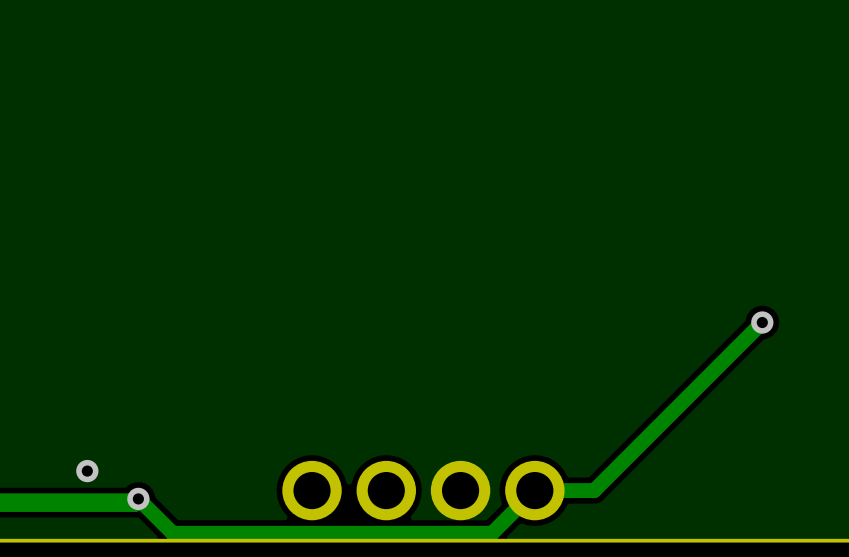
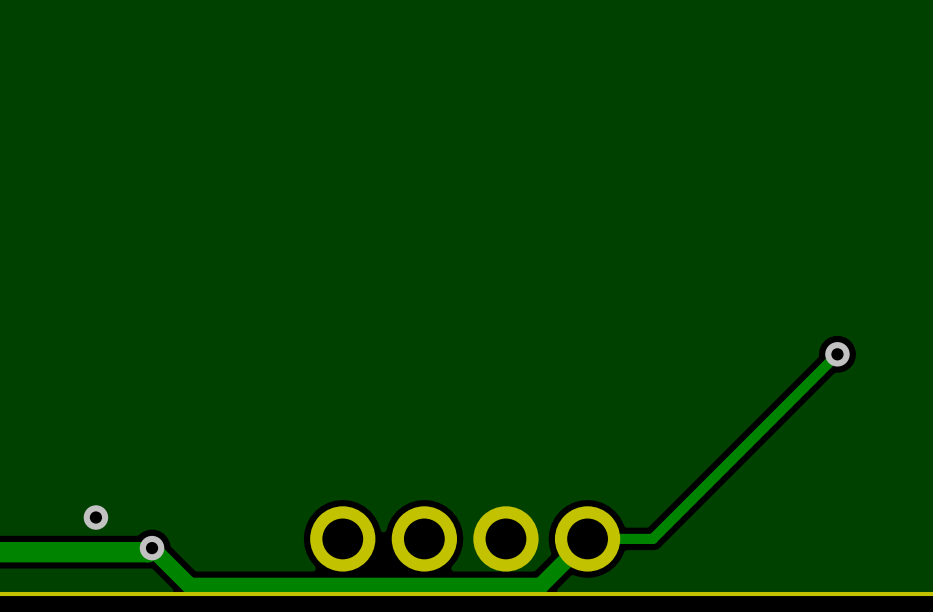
track width: thick (762, 322) (594, 490) (534, 490) -> thin (837, 354) (652, 538) (587, 538)

